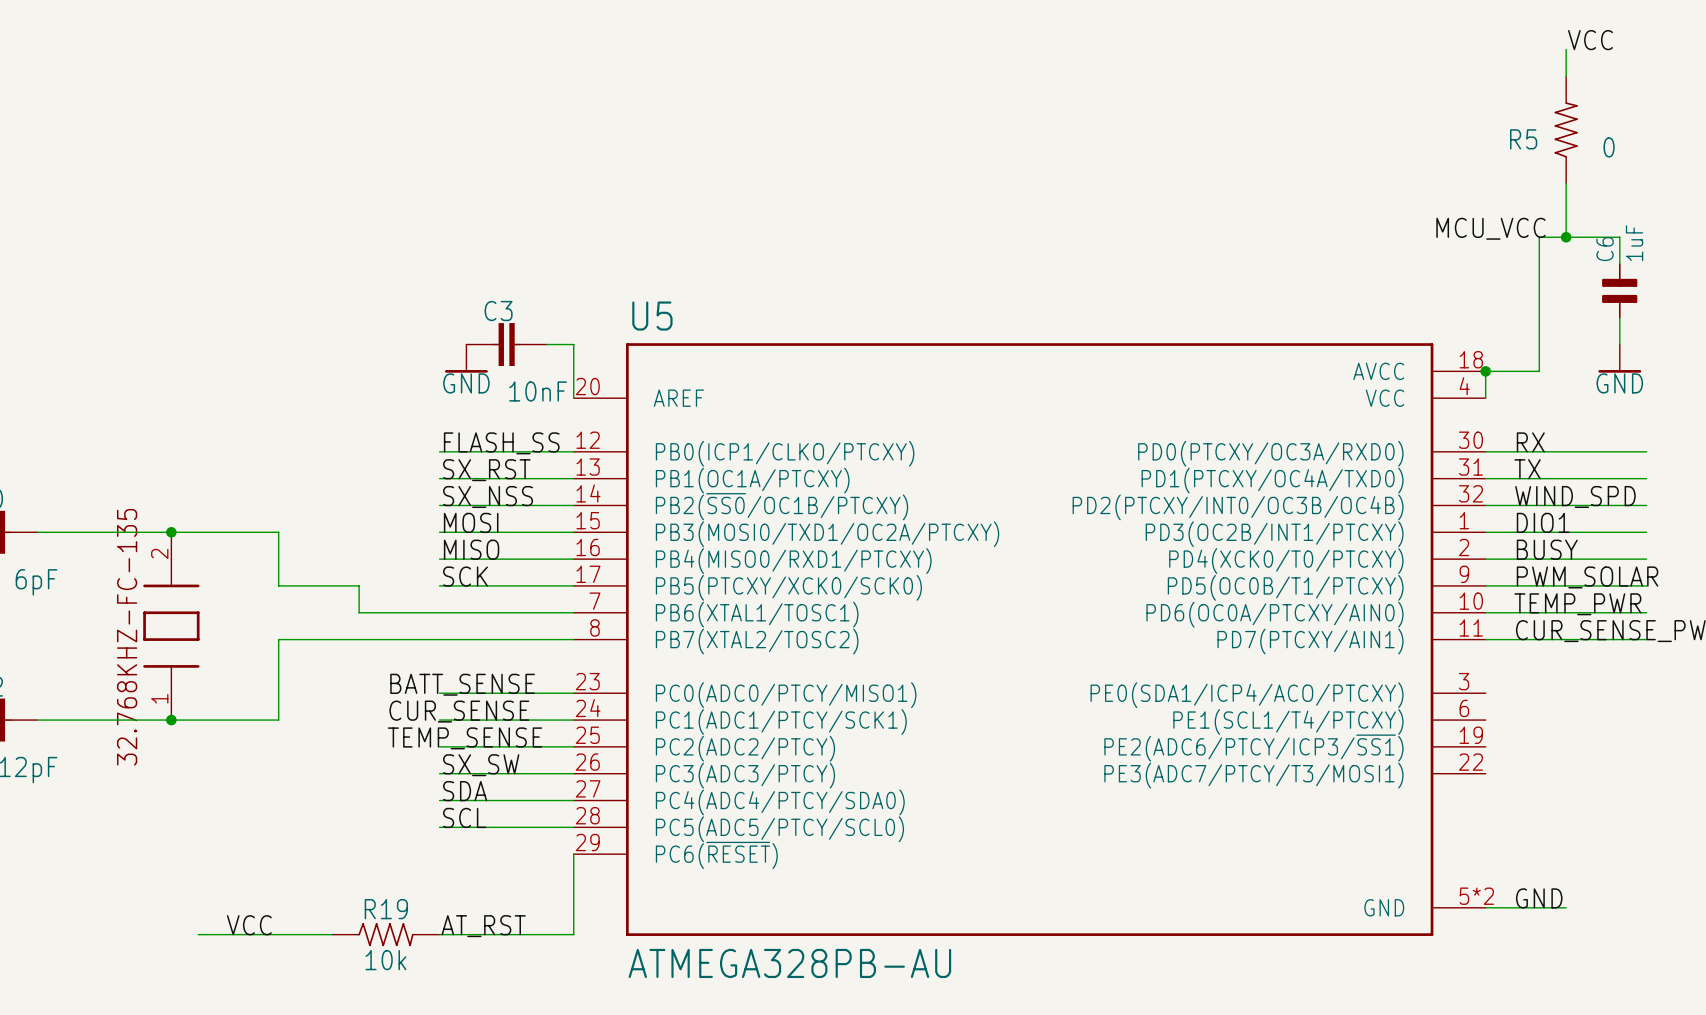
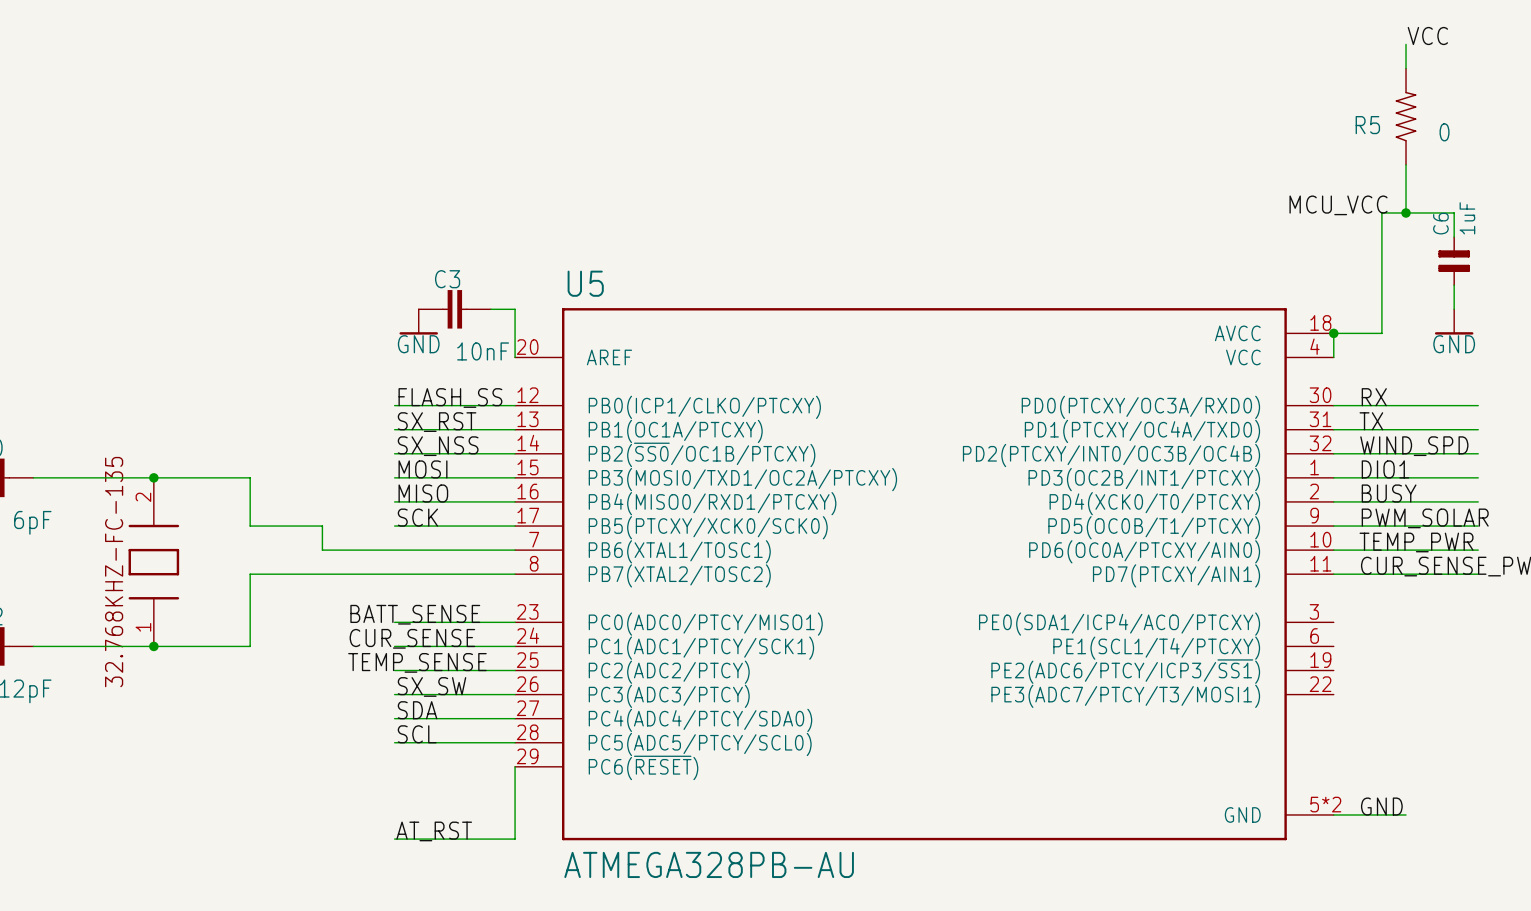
label: VCC (249, 925) -> none
wire: (198, 934) (332, 934) -> none
R19: 10k (385, 934) -> none

